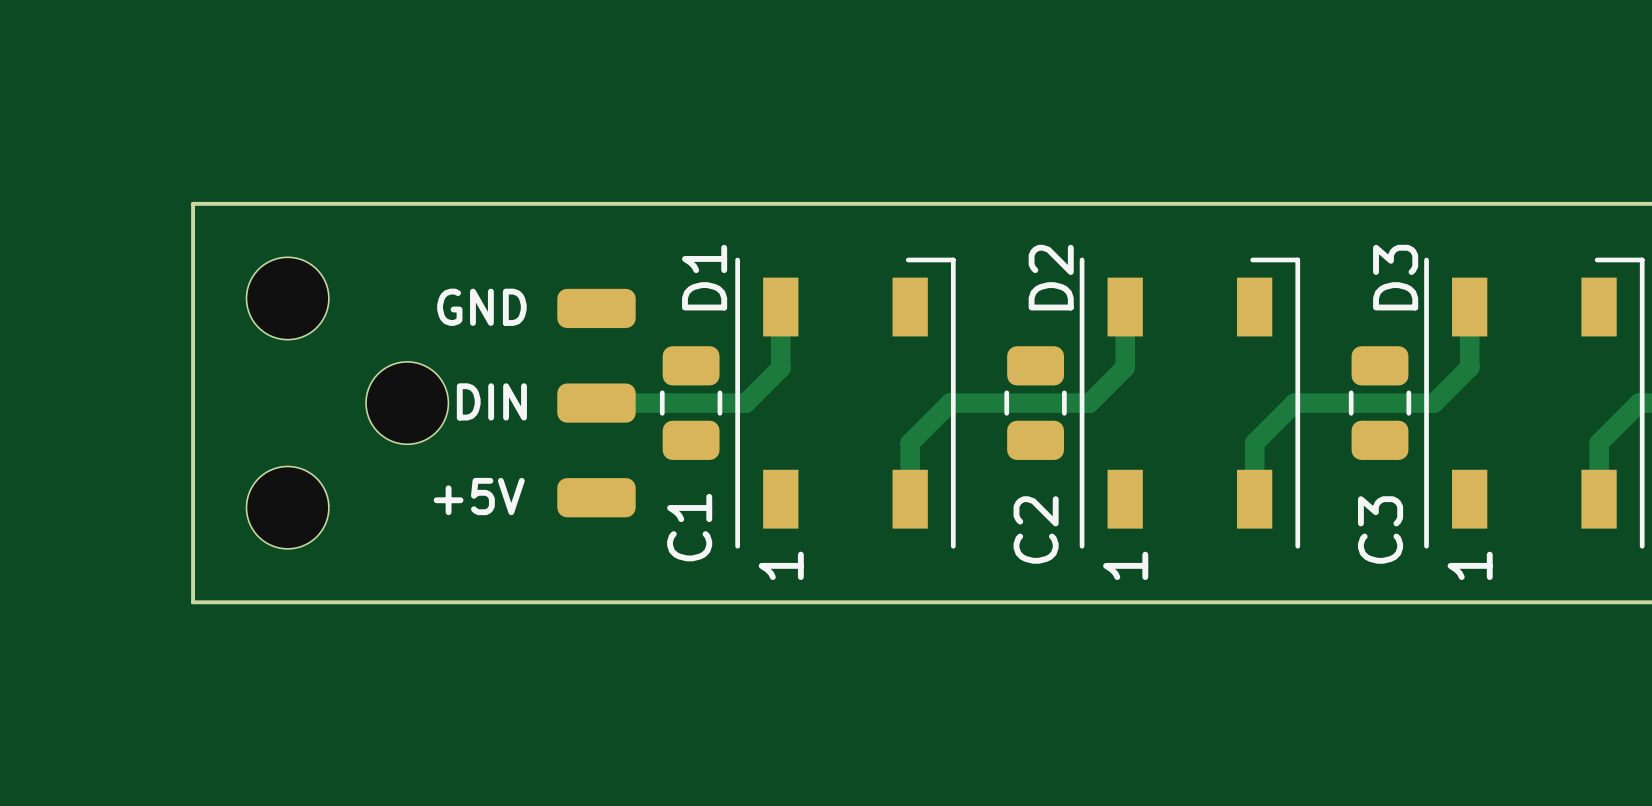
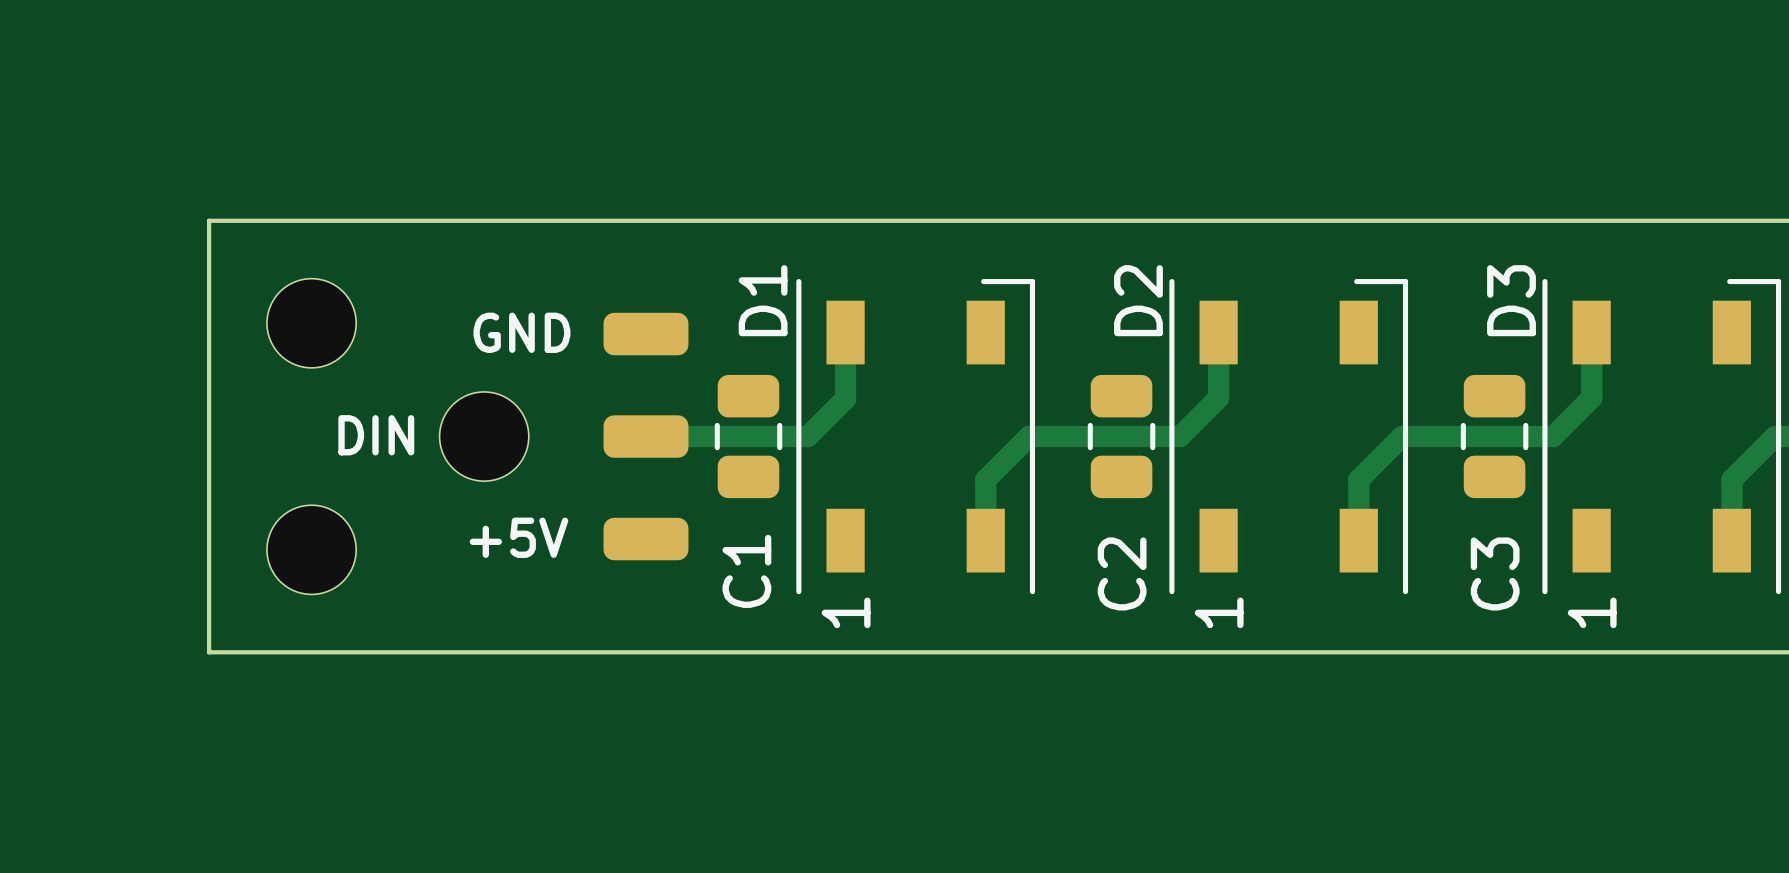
part value position: DIN (491, 401) -> DIN (376, 435)
part position: (407, 403) -> (484, 436)

